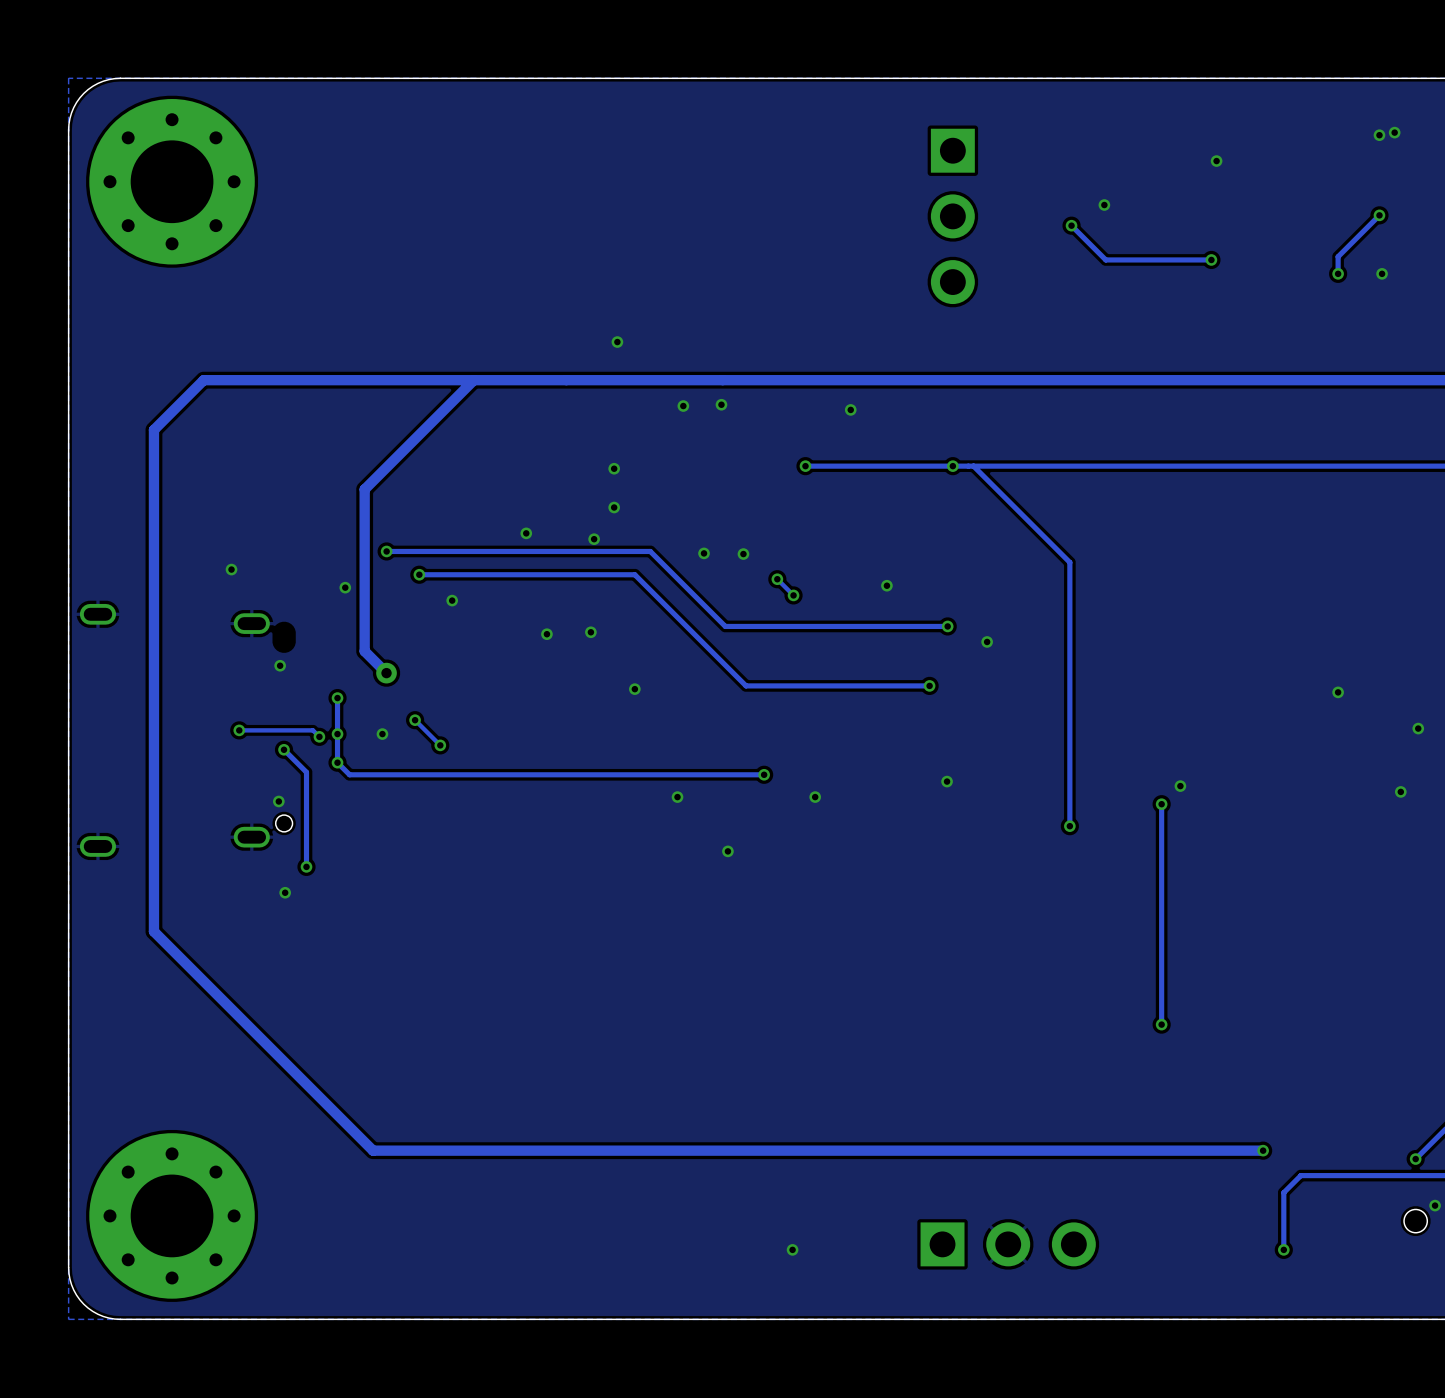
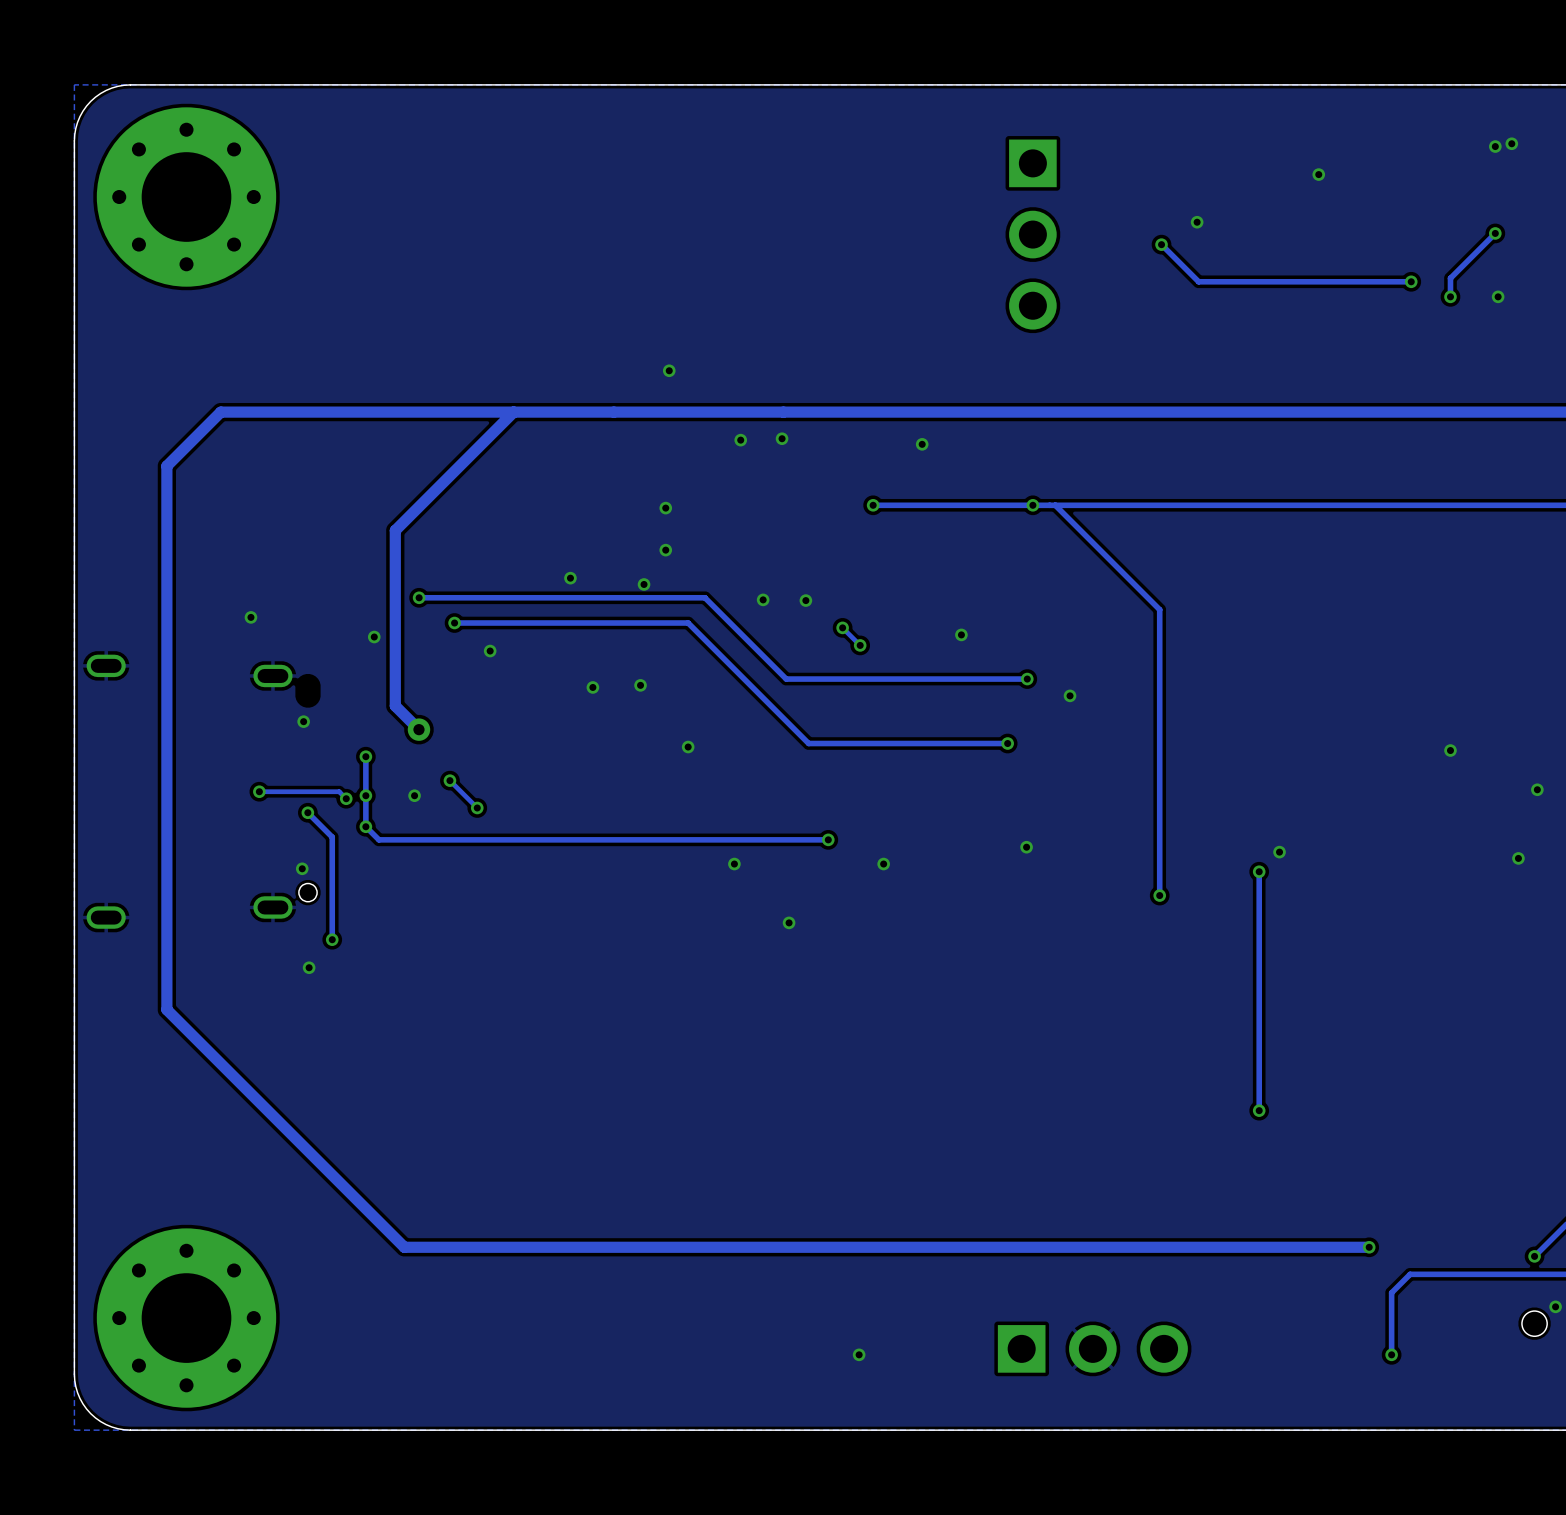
via position: (1211, 259) -> (1411, 281)
track: none -> (1411, 281) (1313, 281)

